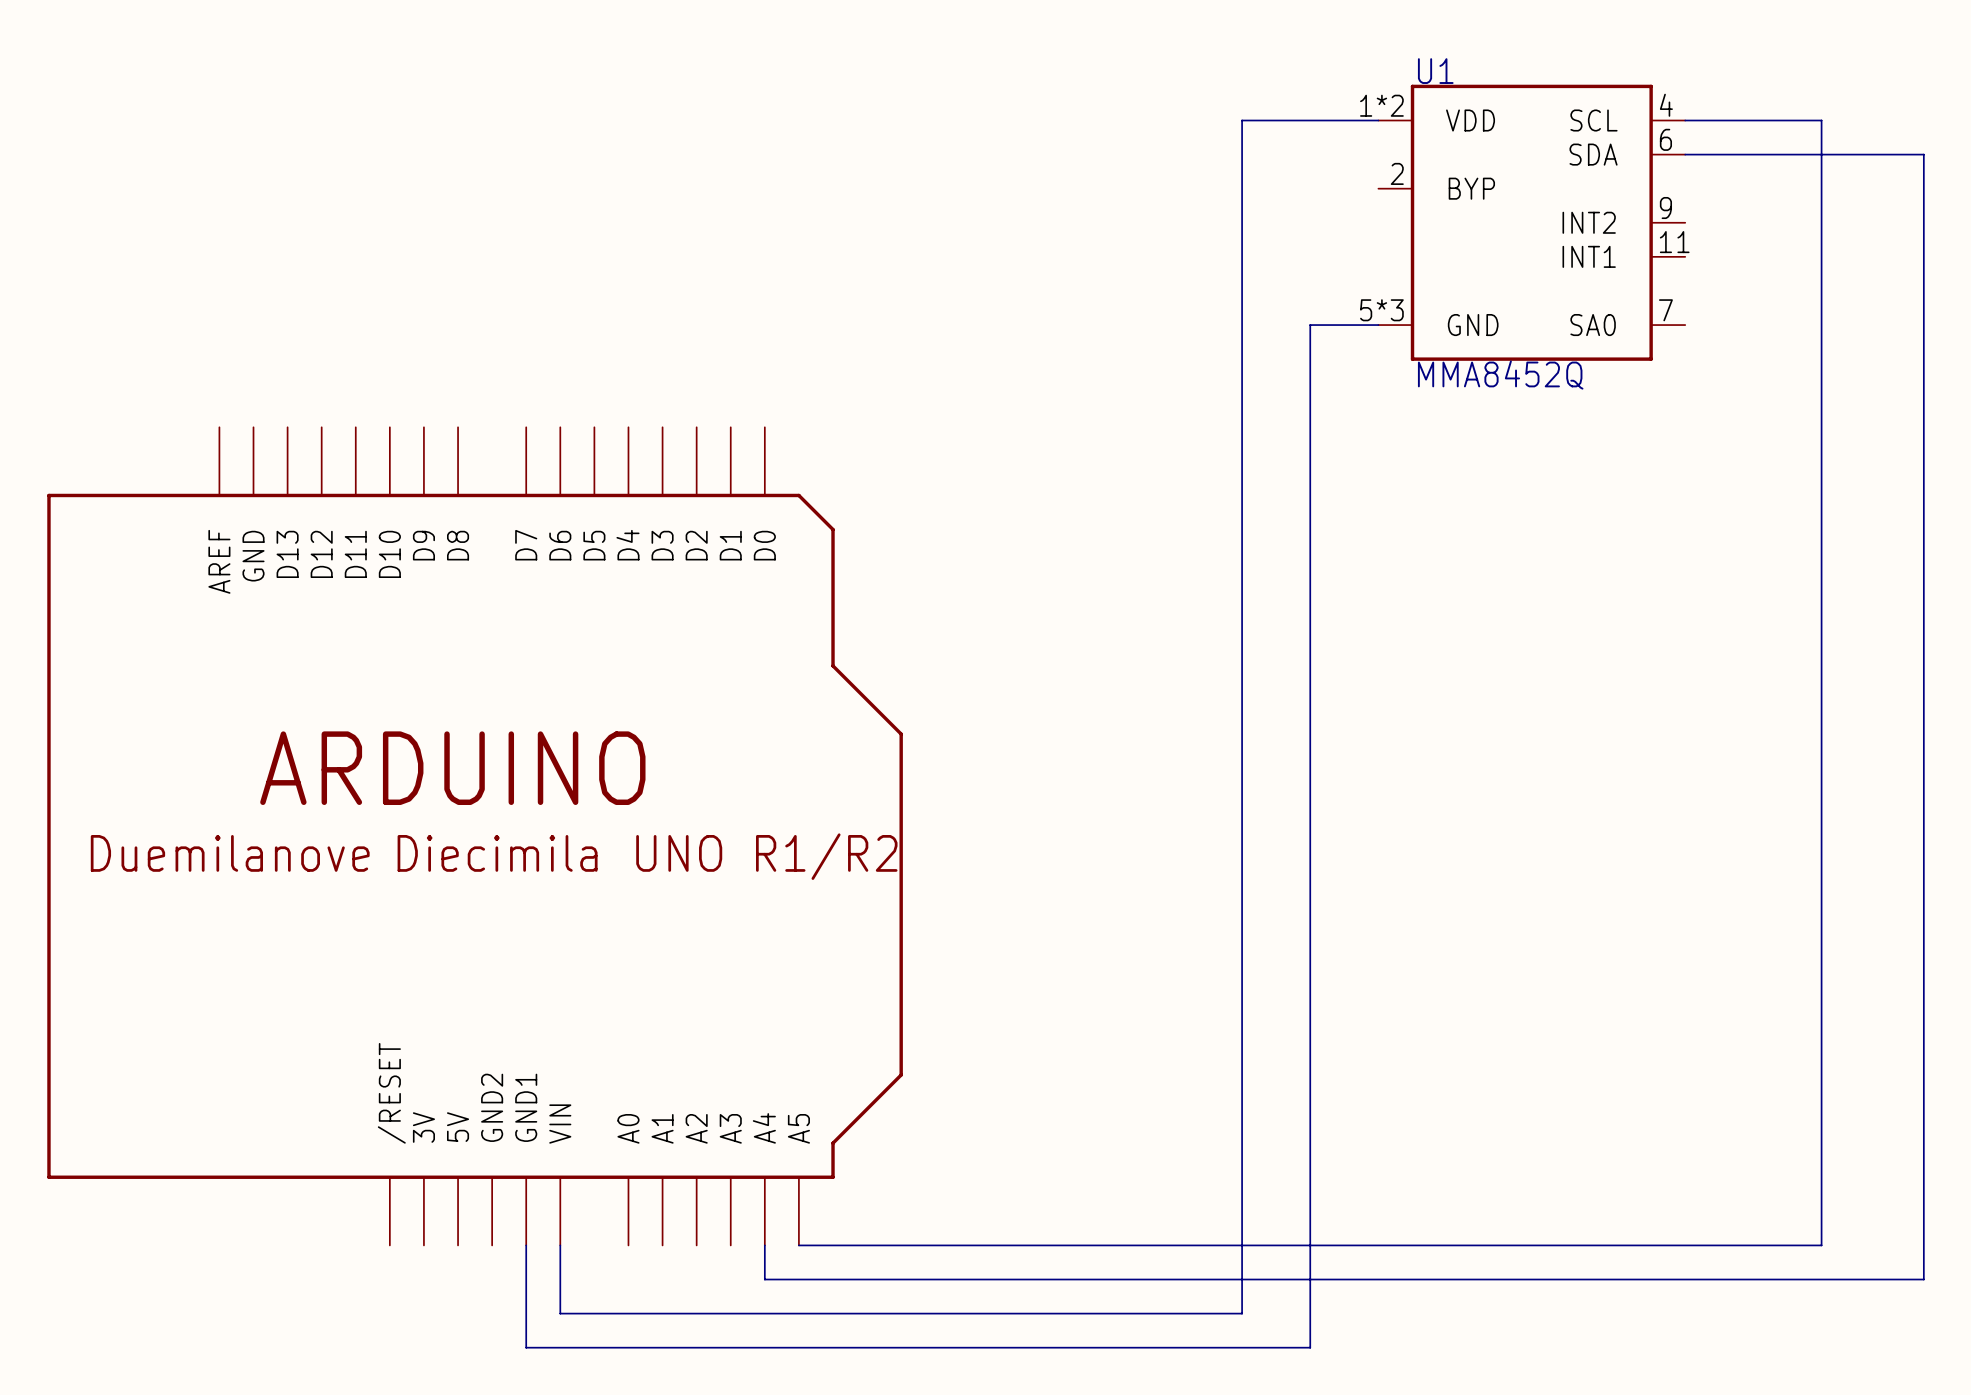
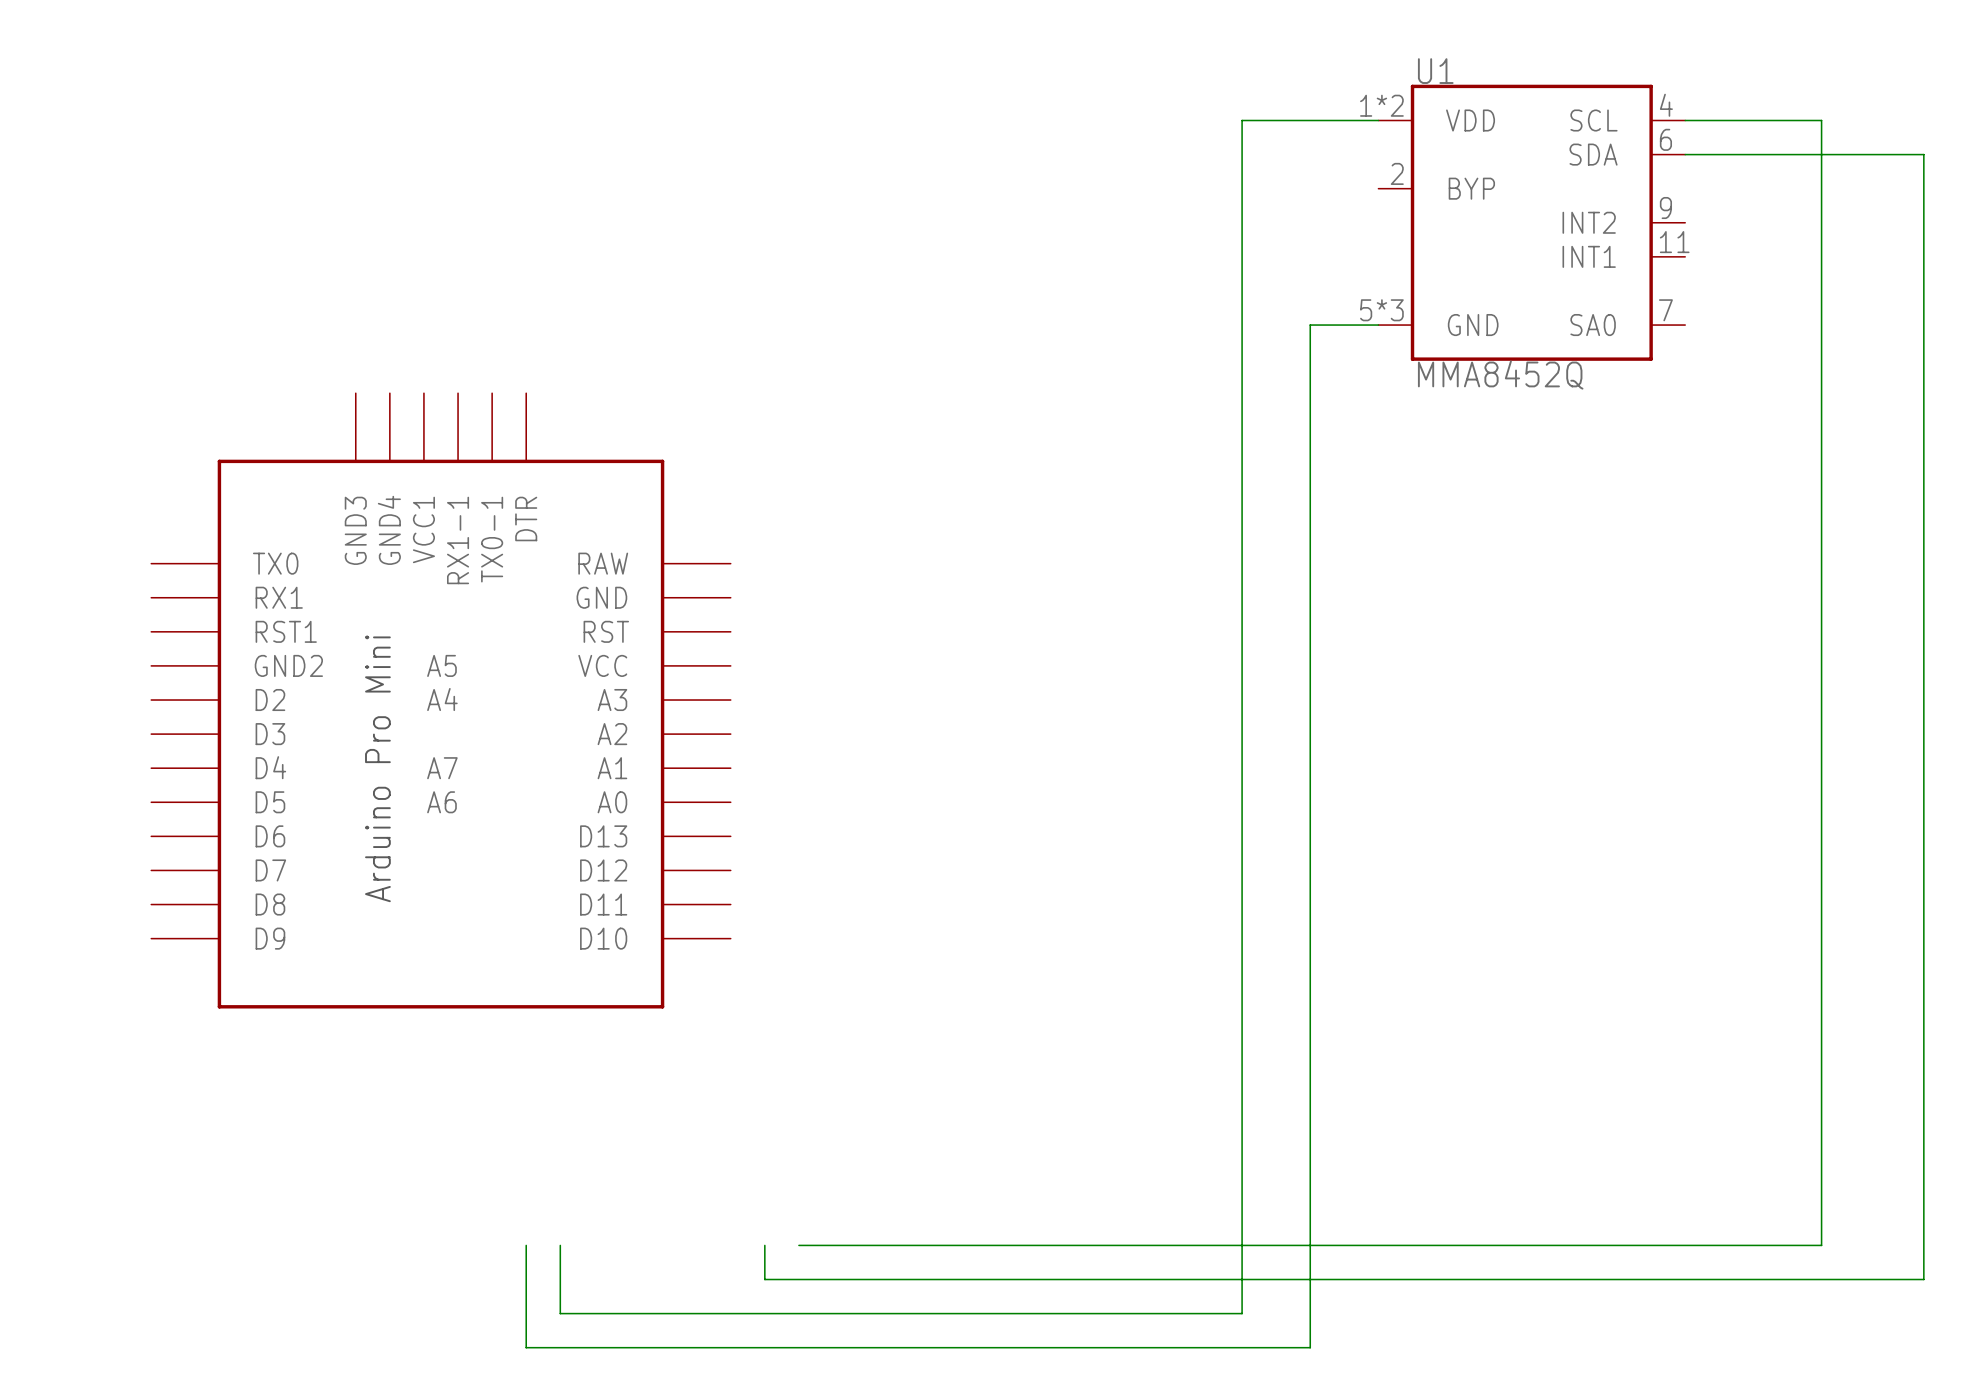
part: none -> (440, 700)
part: (475, 836) -> none

